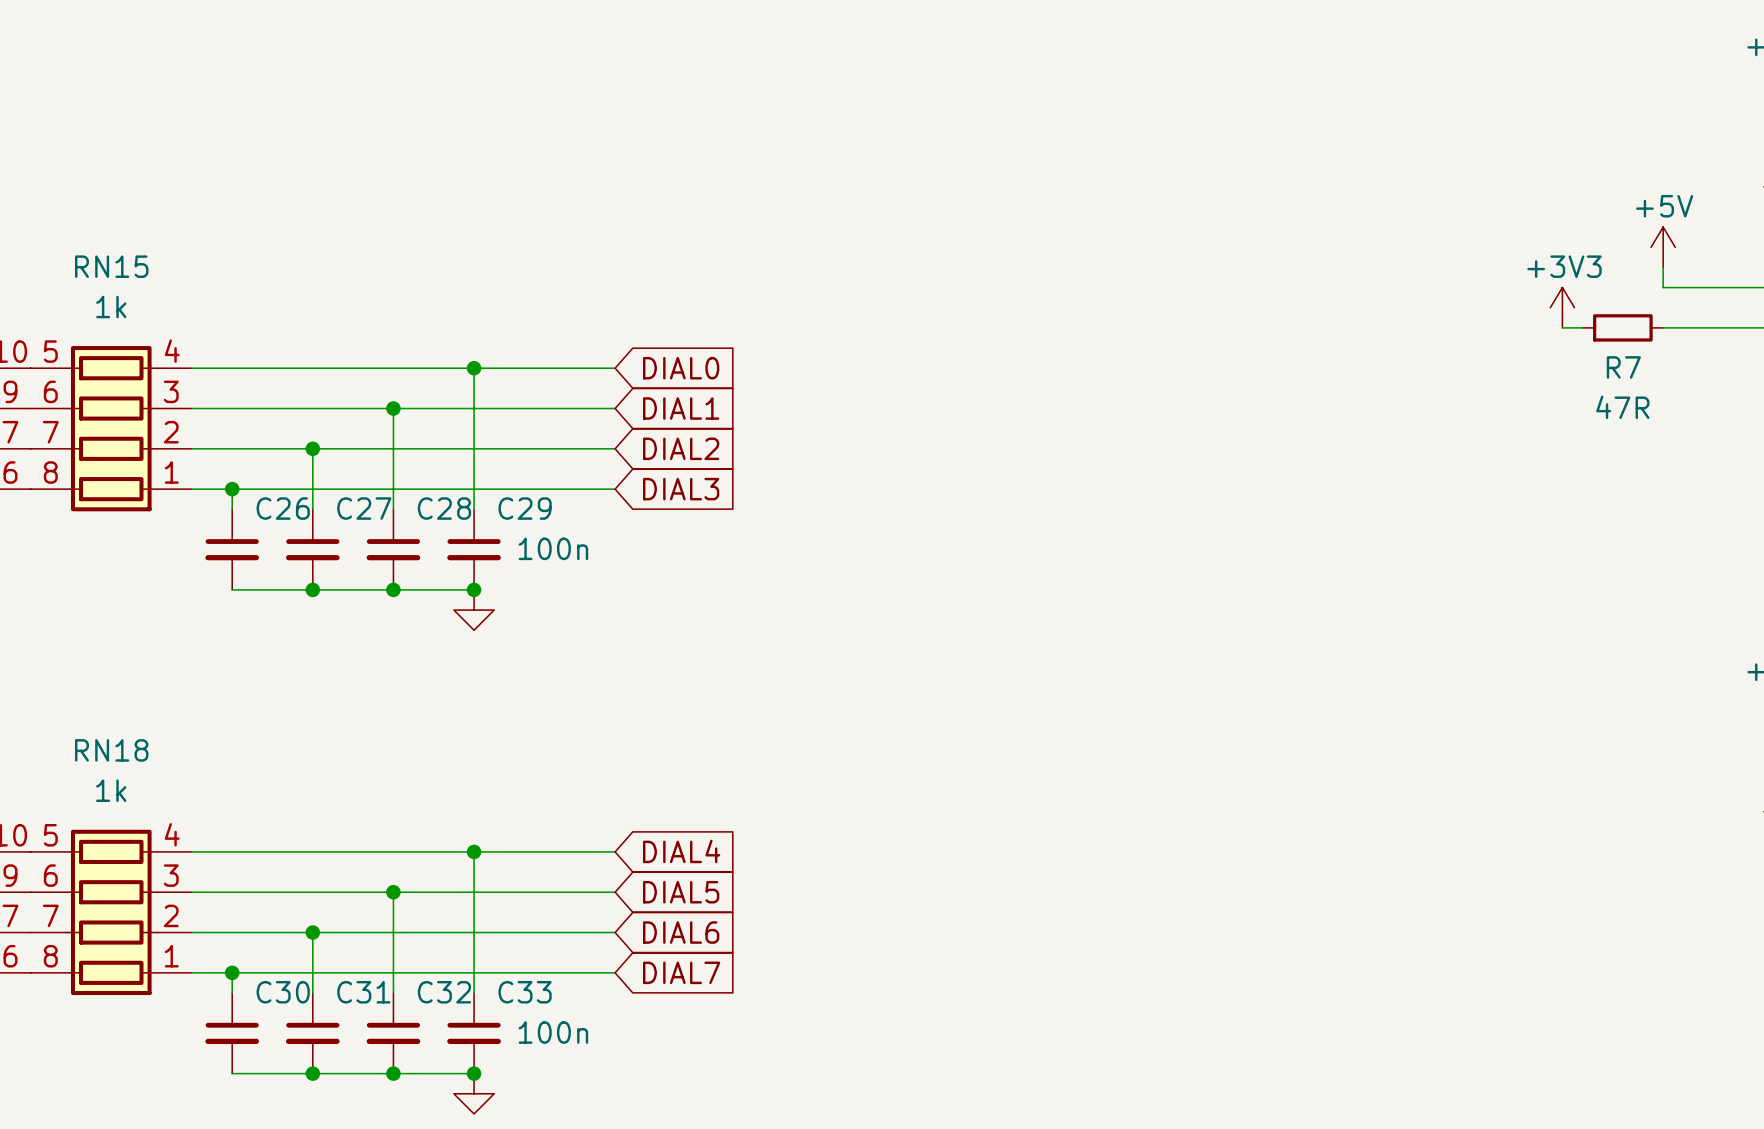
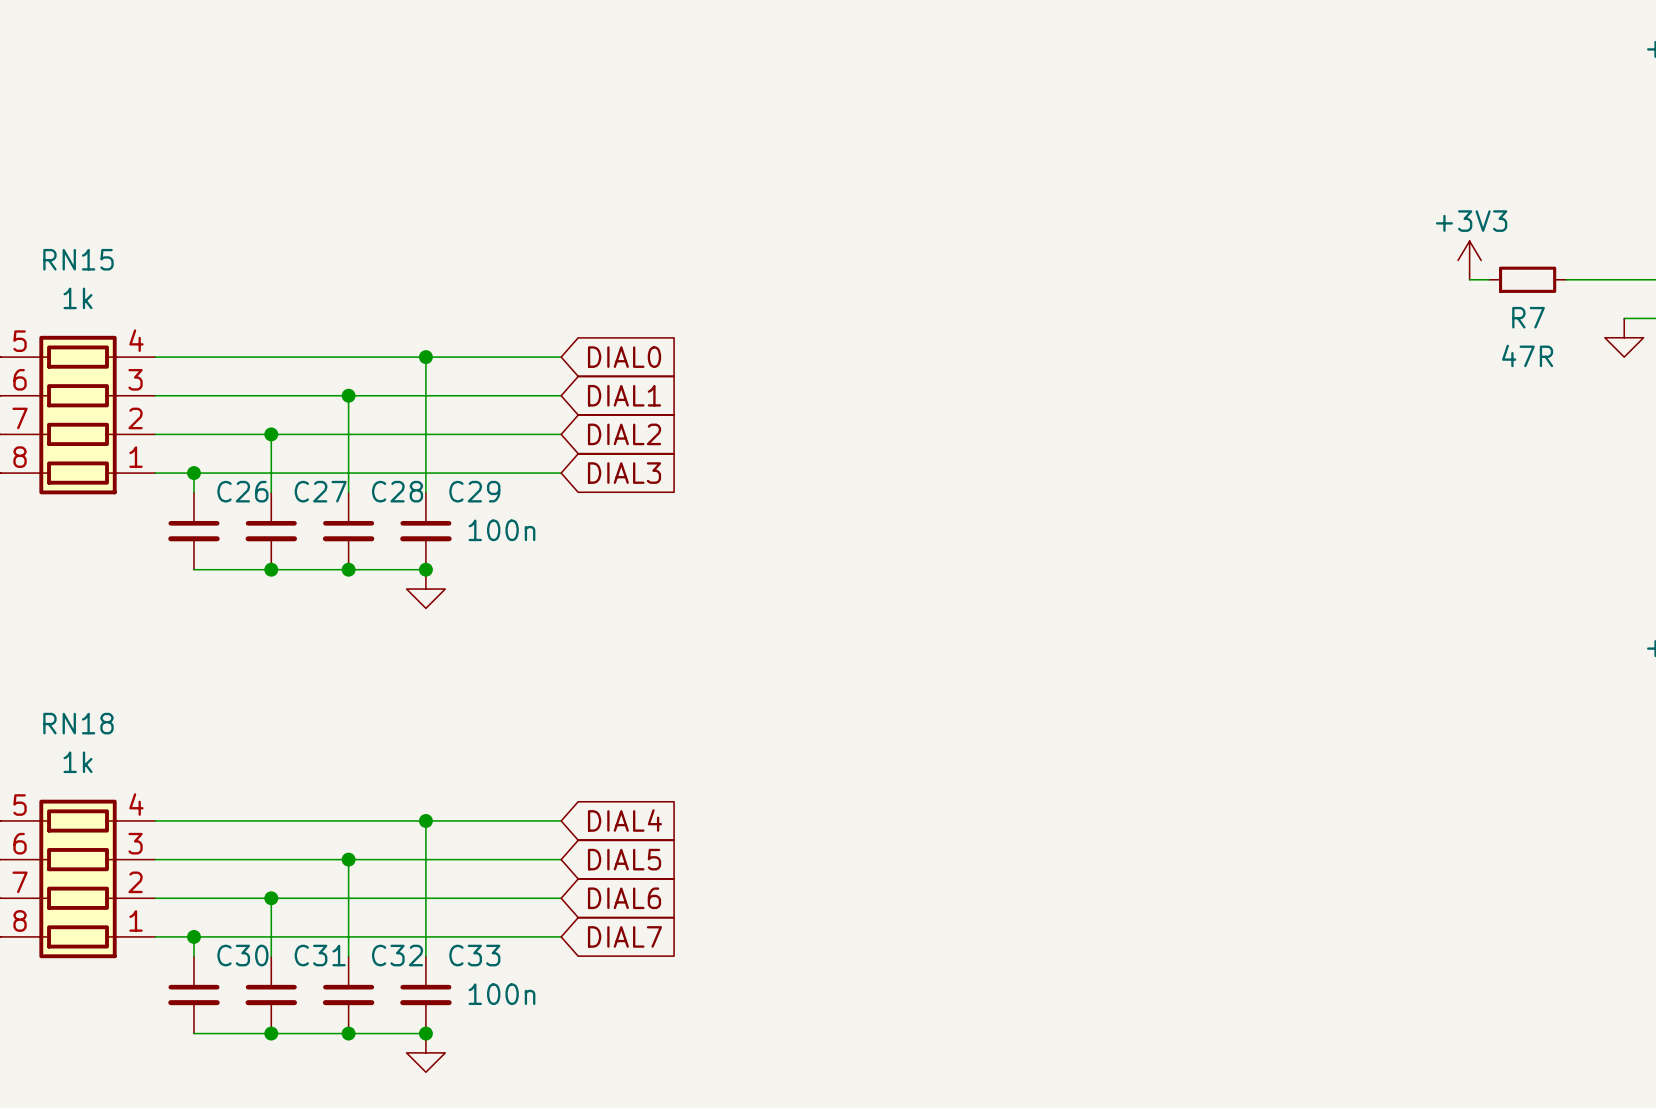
power symbol: +5V (1663, 247) -> none
wire: (1663, 267) (1663, 287) -> none
power symbol position: +3V3 (1562, 307) -> +3V3 (1469, 260)
wire: (1562, 327) (1582, 327) -> (1469, 279) (1488, 279)
R7 position: (1622, 327) -> (1527, 279)
wire: (1663, 327) (1723, 327) -> none
power symbol: none -> (1624, 337)

